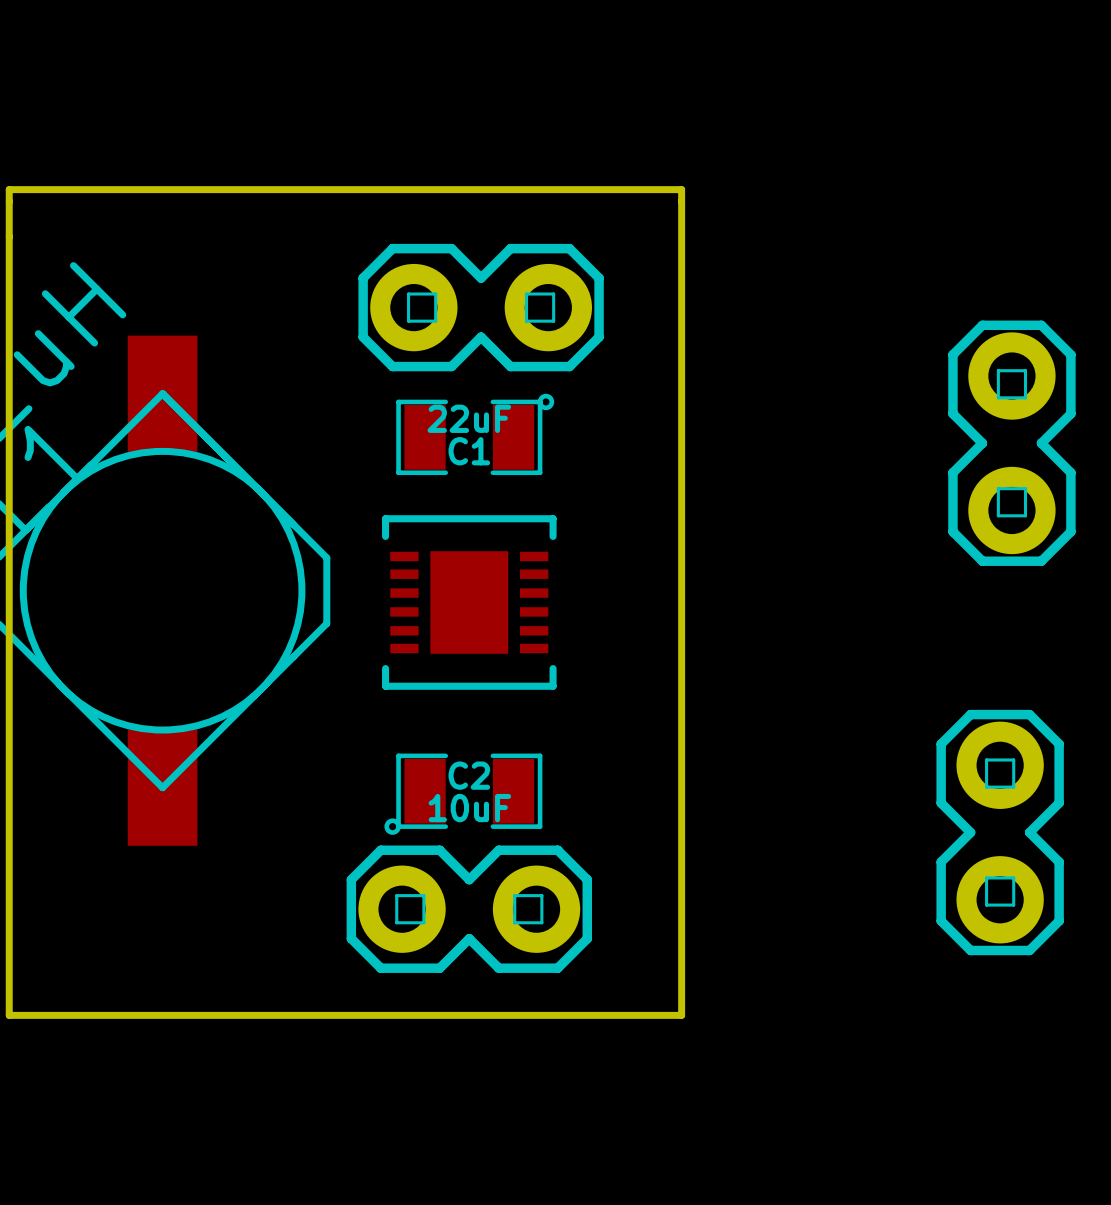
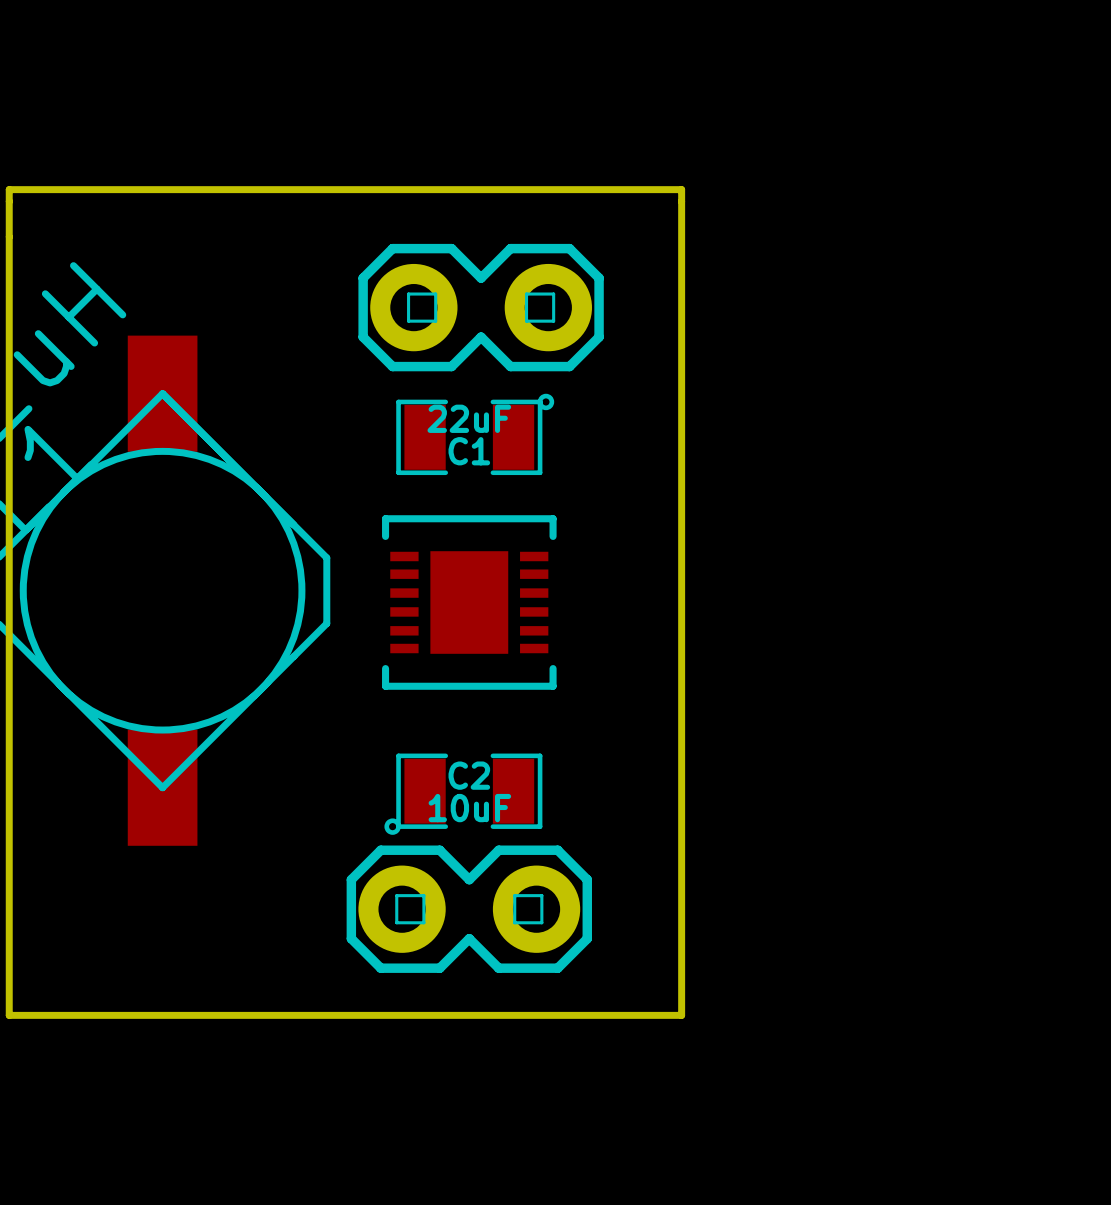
part: (1011, 443) -> none
part: (1000, 832) -> none

